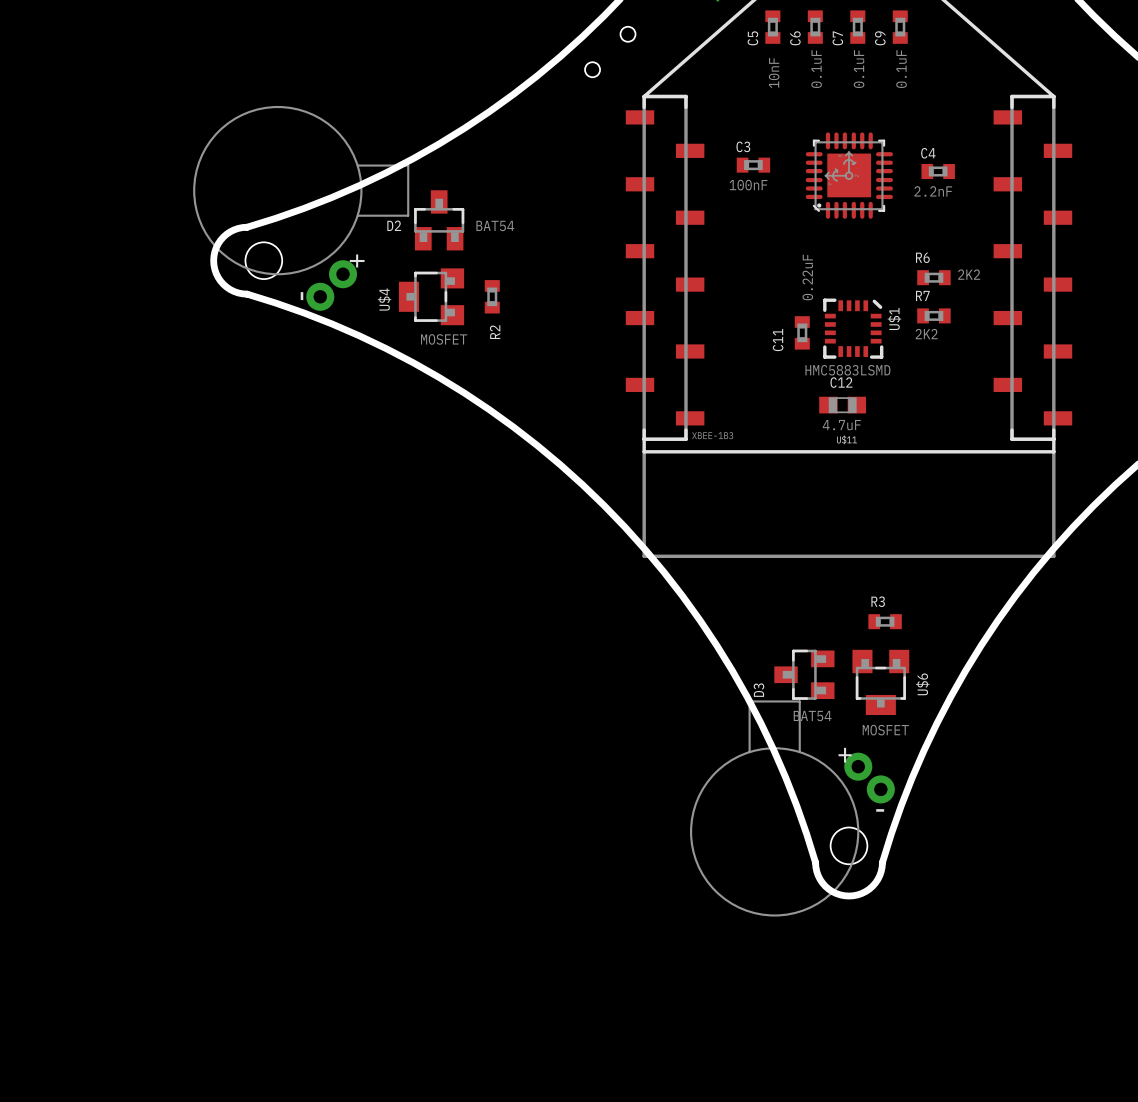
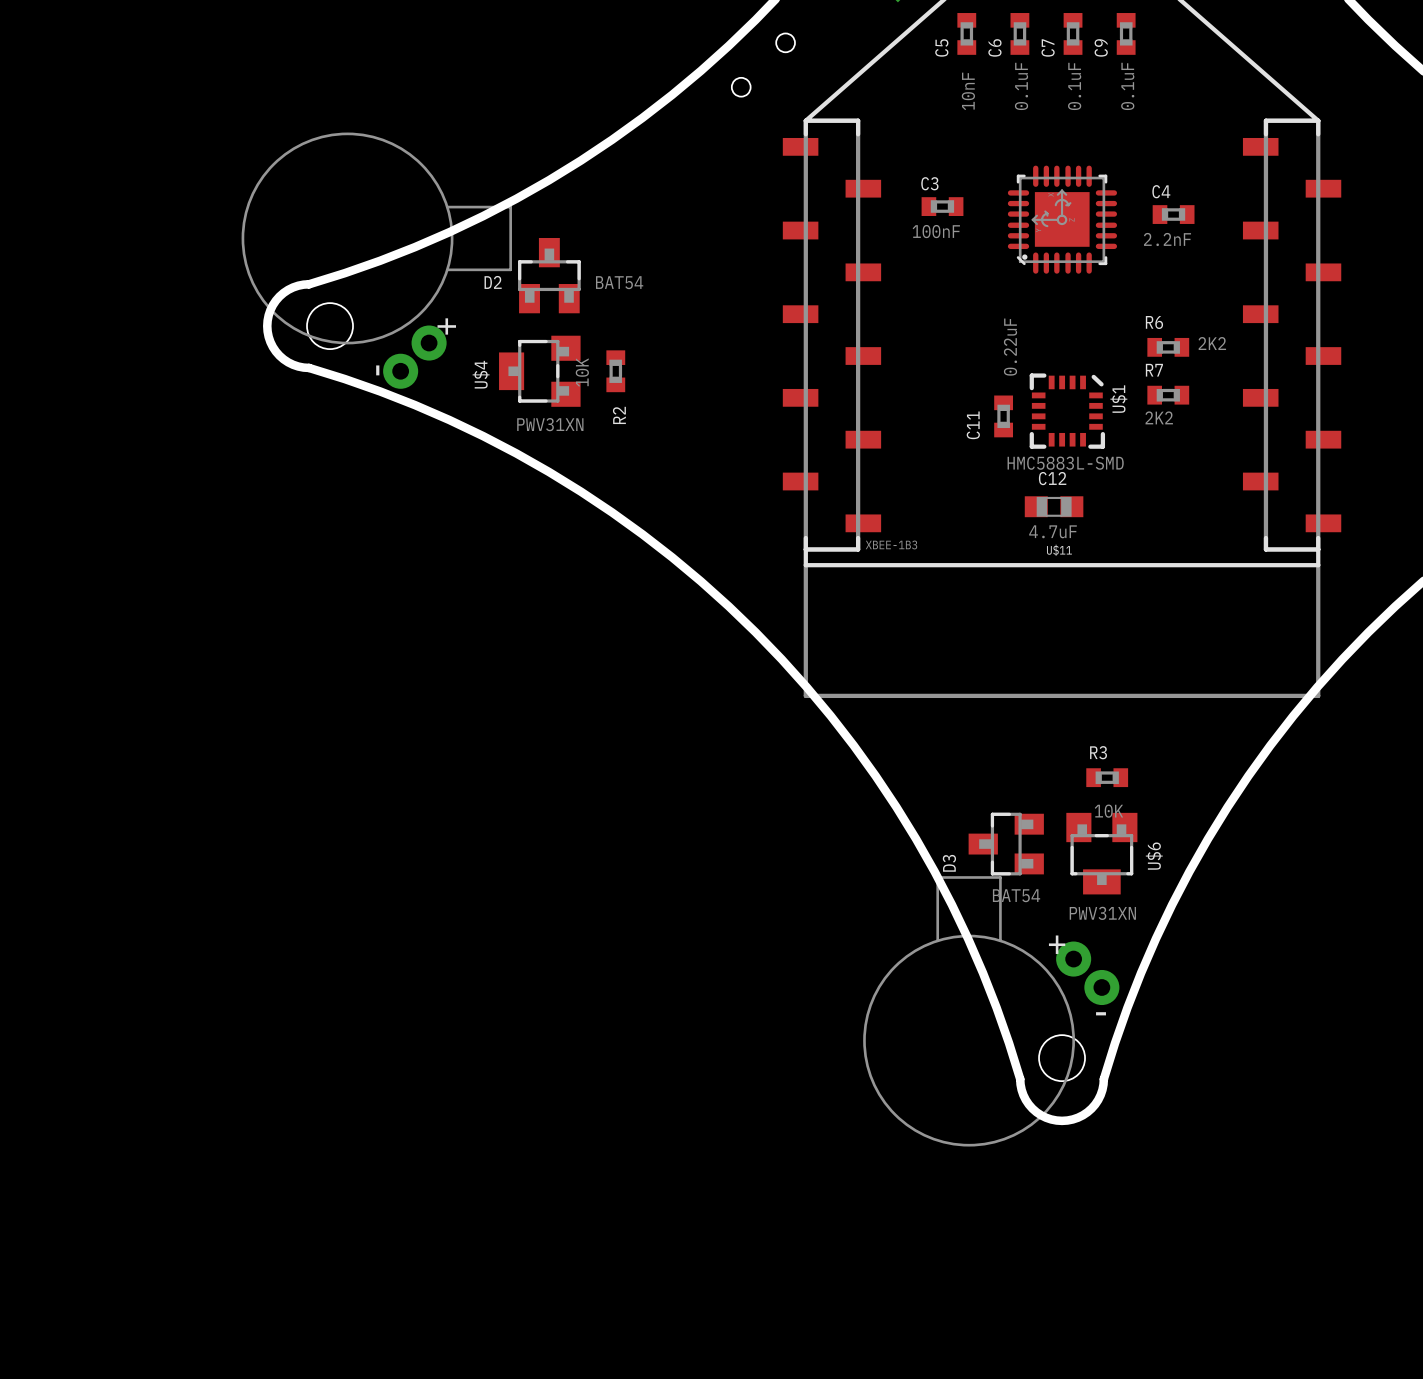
R2 value: none -> 10K (582, 372)
U$4 value: MOSFET (444, 339) -> PWV31XN (550, 424)
U$1 value: HMC5883LSMD (847, 370) -> HMC5883L-SMD (1065, 463)
R3 value: none -> 10K (1108, 811)
U$6 value: MOSFET (885, 730) -> PWV31XN (1102, 913)

